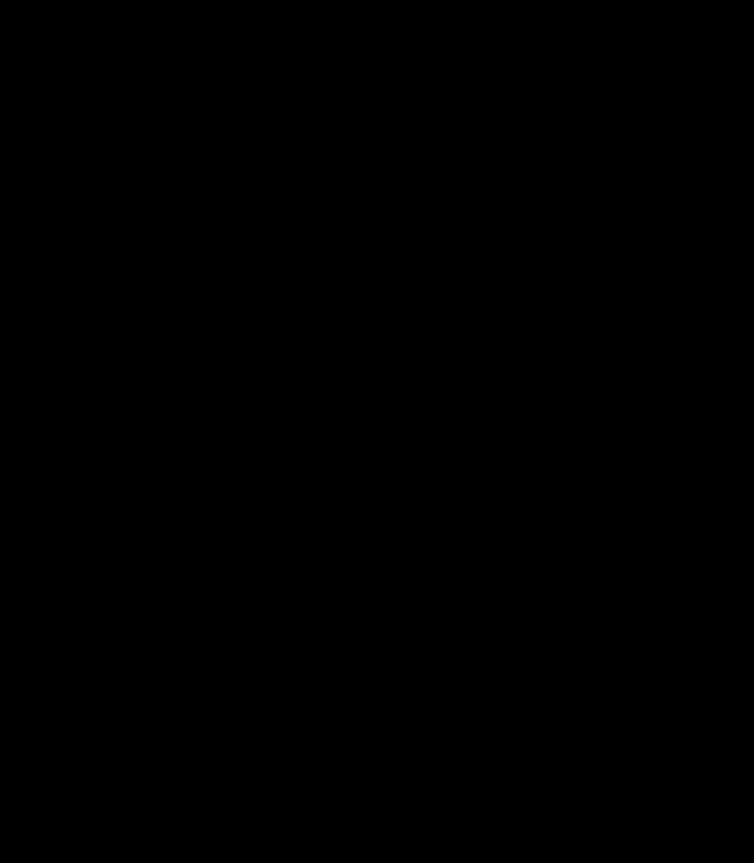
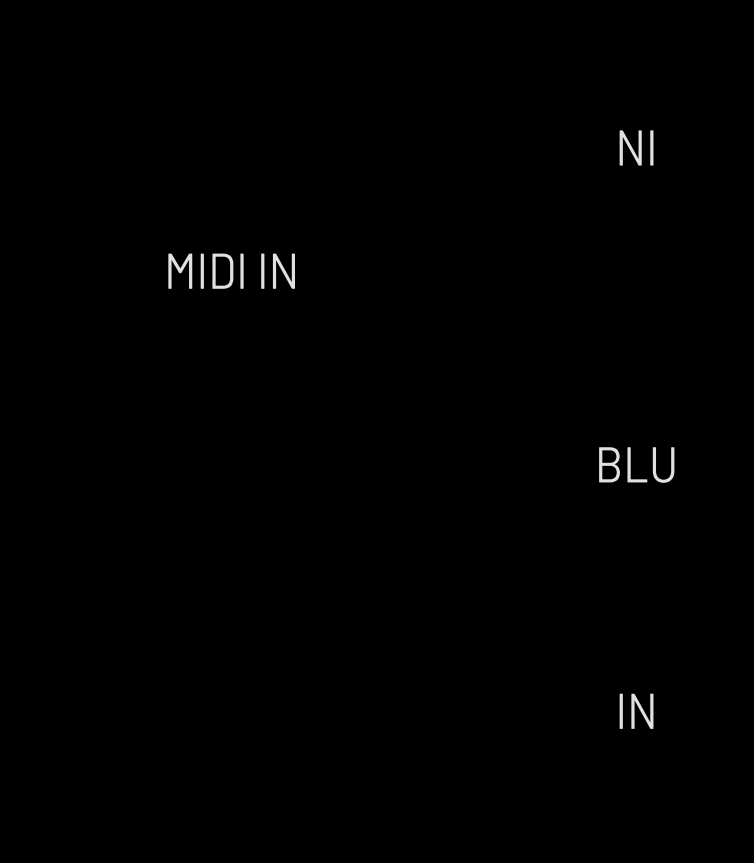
text: none -> NI (636, 147)
text: none -> MIDI IN (231, 271)
text: none -> BLU (636, 465)
text: none -> IN (636, 711)

